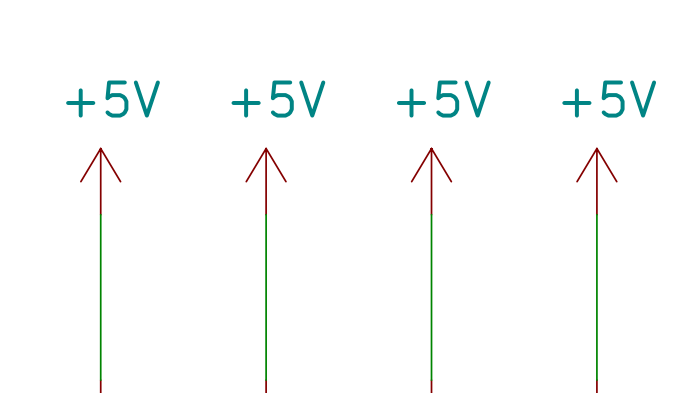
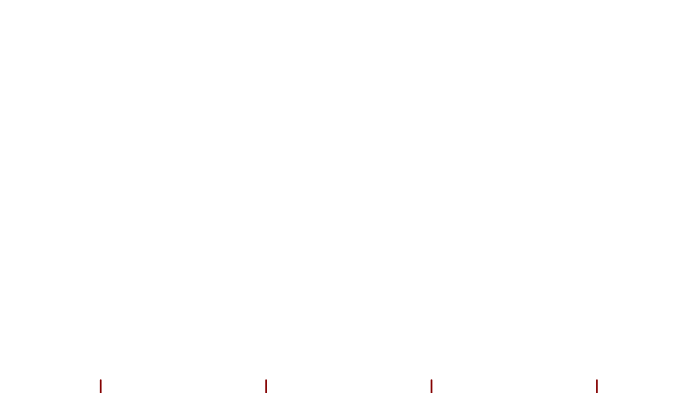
power symbol: +5V (100, 181) -> none
power symbol: +5V (266, 181) -> none
power symbol: +5V (431, 181) -> none
power symbol: +5V (596, 181) -> none
wire: (100, 214) (100, 380) -> none
wire: (266, 214) (266, 380) -> none
wire: (431, 214) (431, 380) -> none
wire: (596, 214) (596, 380) -> none

